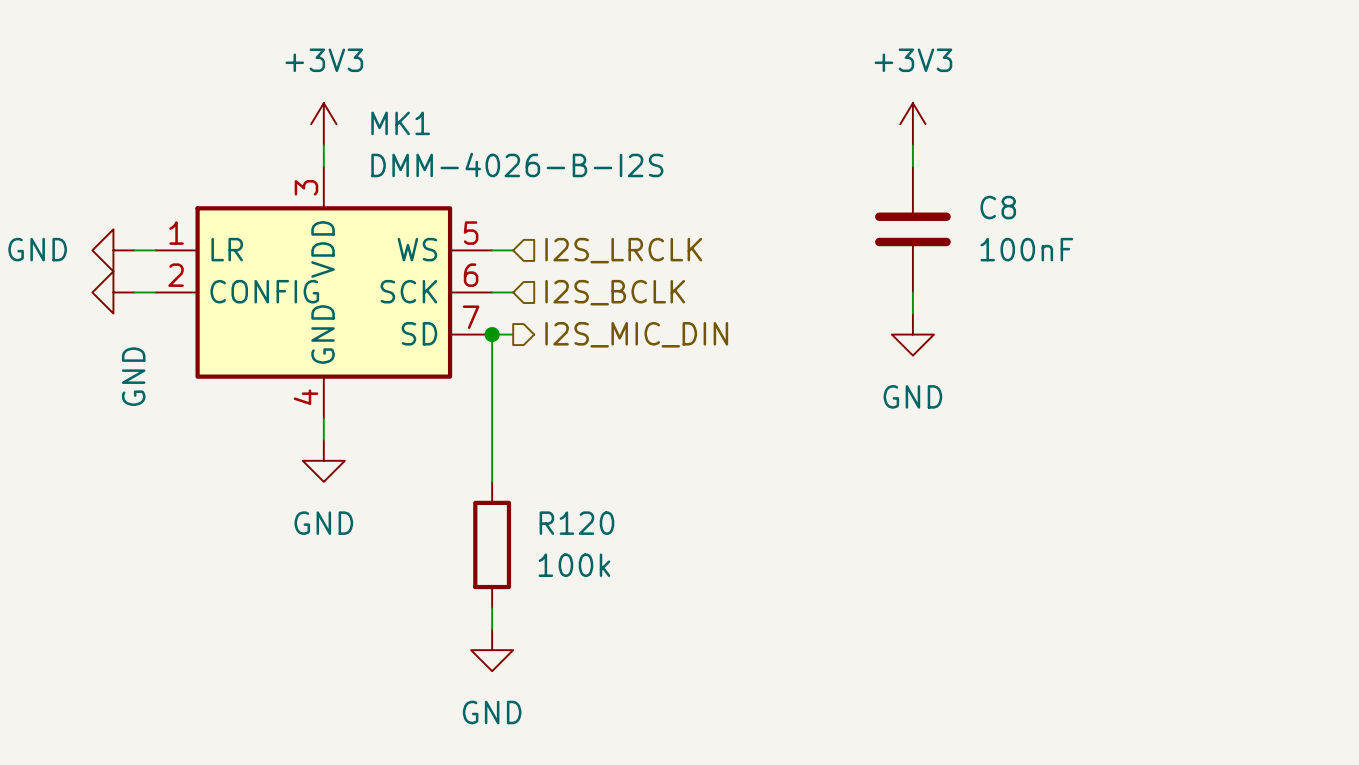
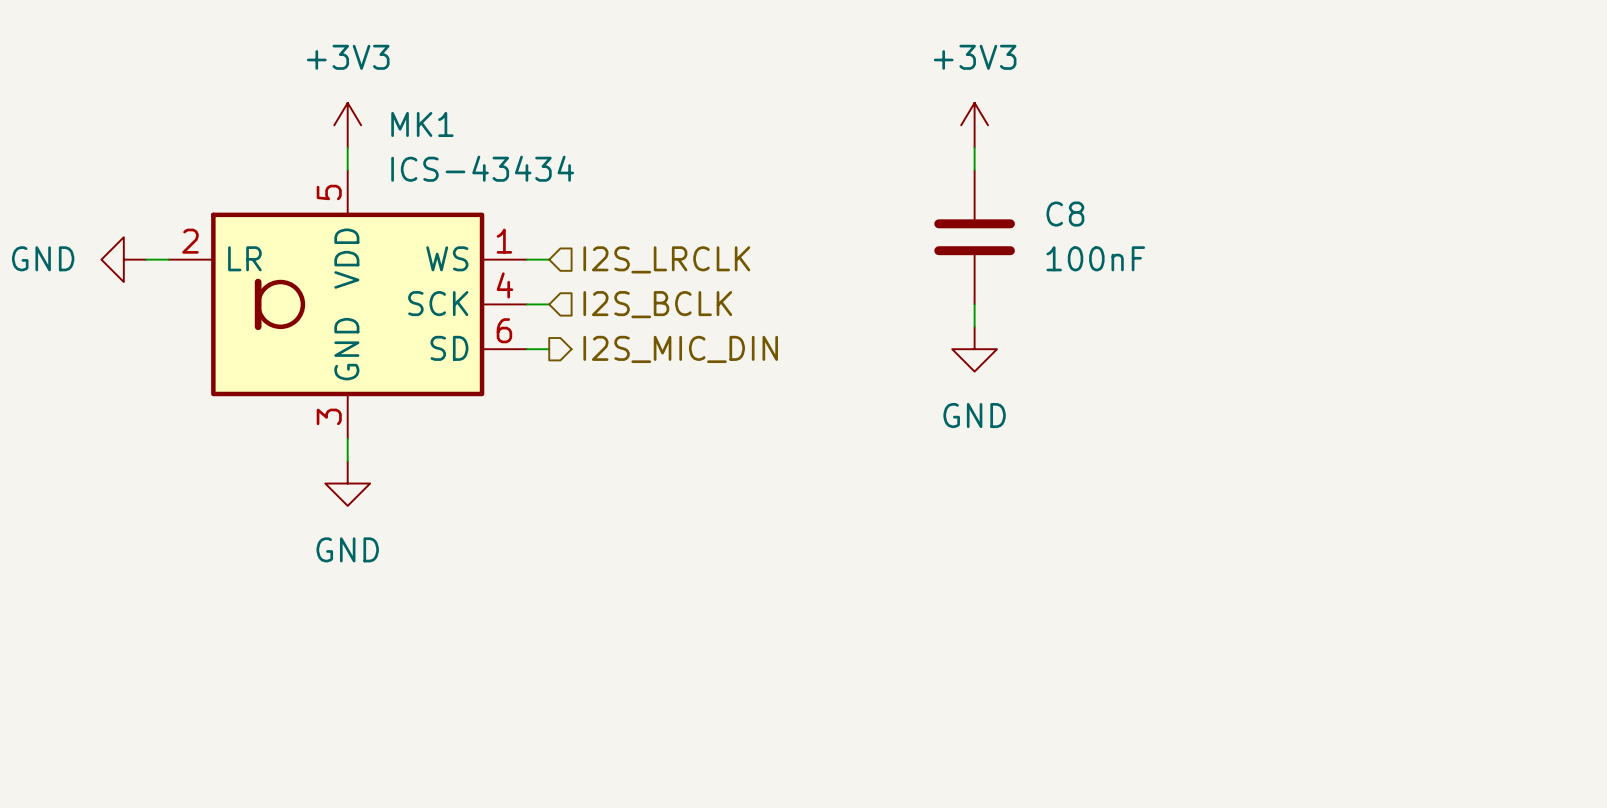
MK1 value: DMM-4026-B-I2S (517, 164) -> ICS-43434 (482, 168)
MK1 symbol: [155, 166, 493, 419] -> [168, 170, 527, 439]
power symbol: GND (113, 292) -> none
wire: (134, 292) (155, 292) -> none
wire: (492, 334) (492, 481) -> none
junction: (492, 334) -> none
R120: 100k (492, 544) -> none
wire: (492, 608) (492, 629) -> none
power symbol: GND (492, 650) -> none

